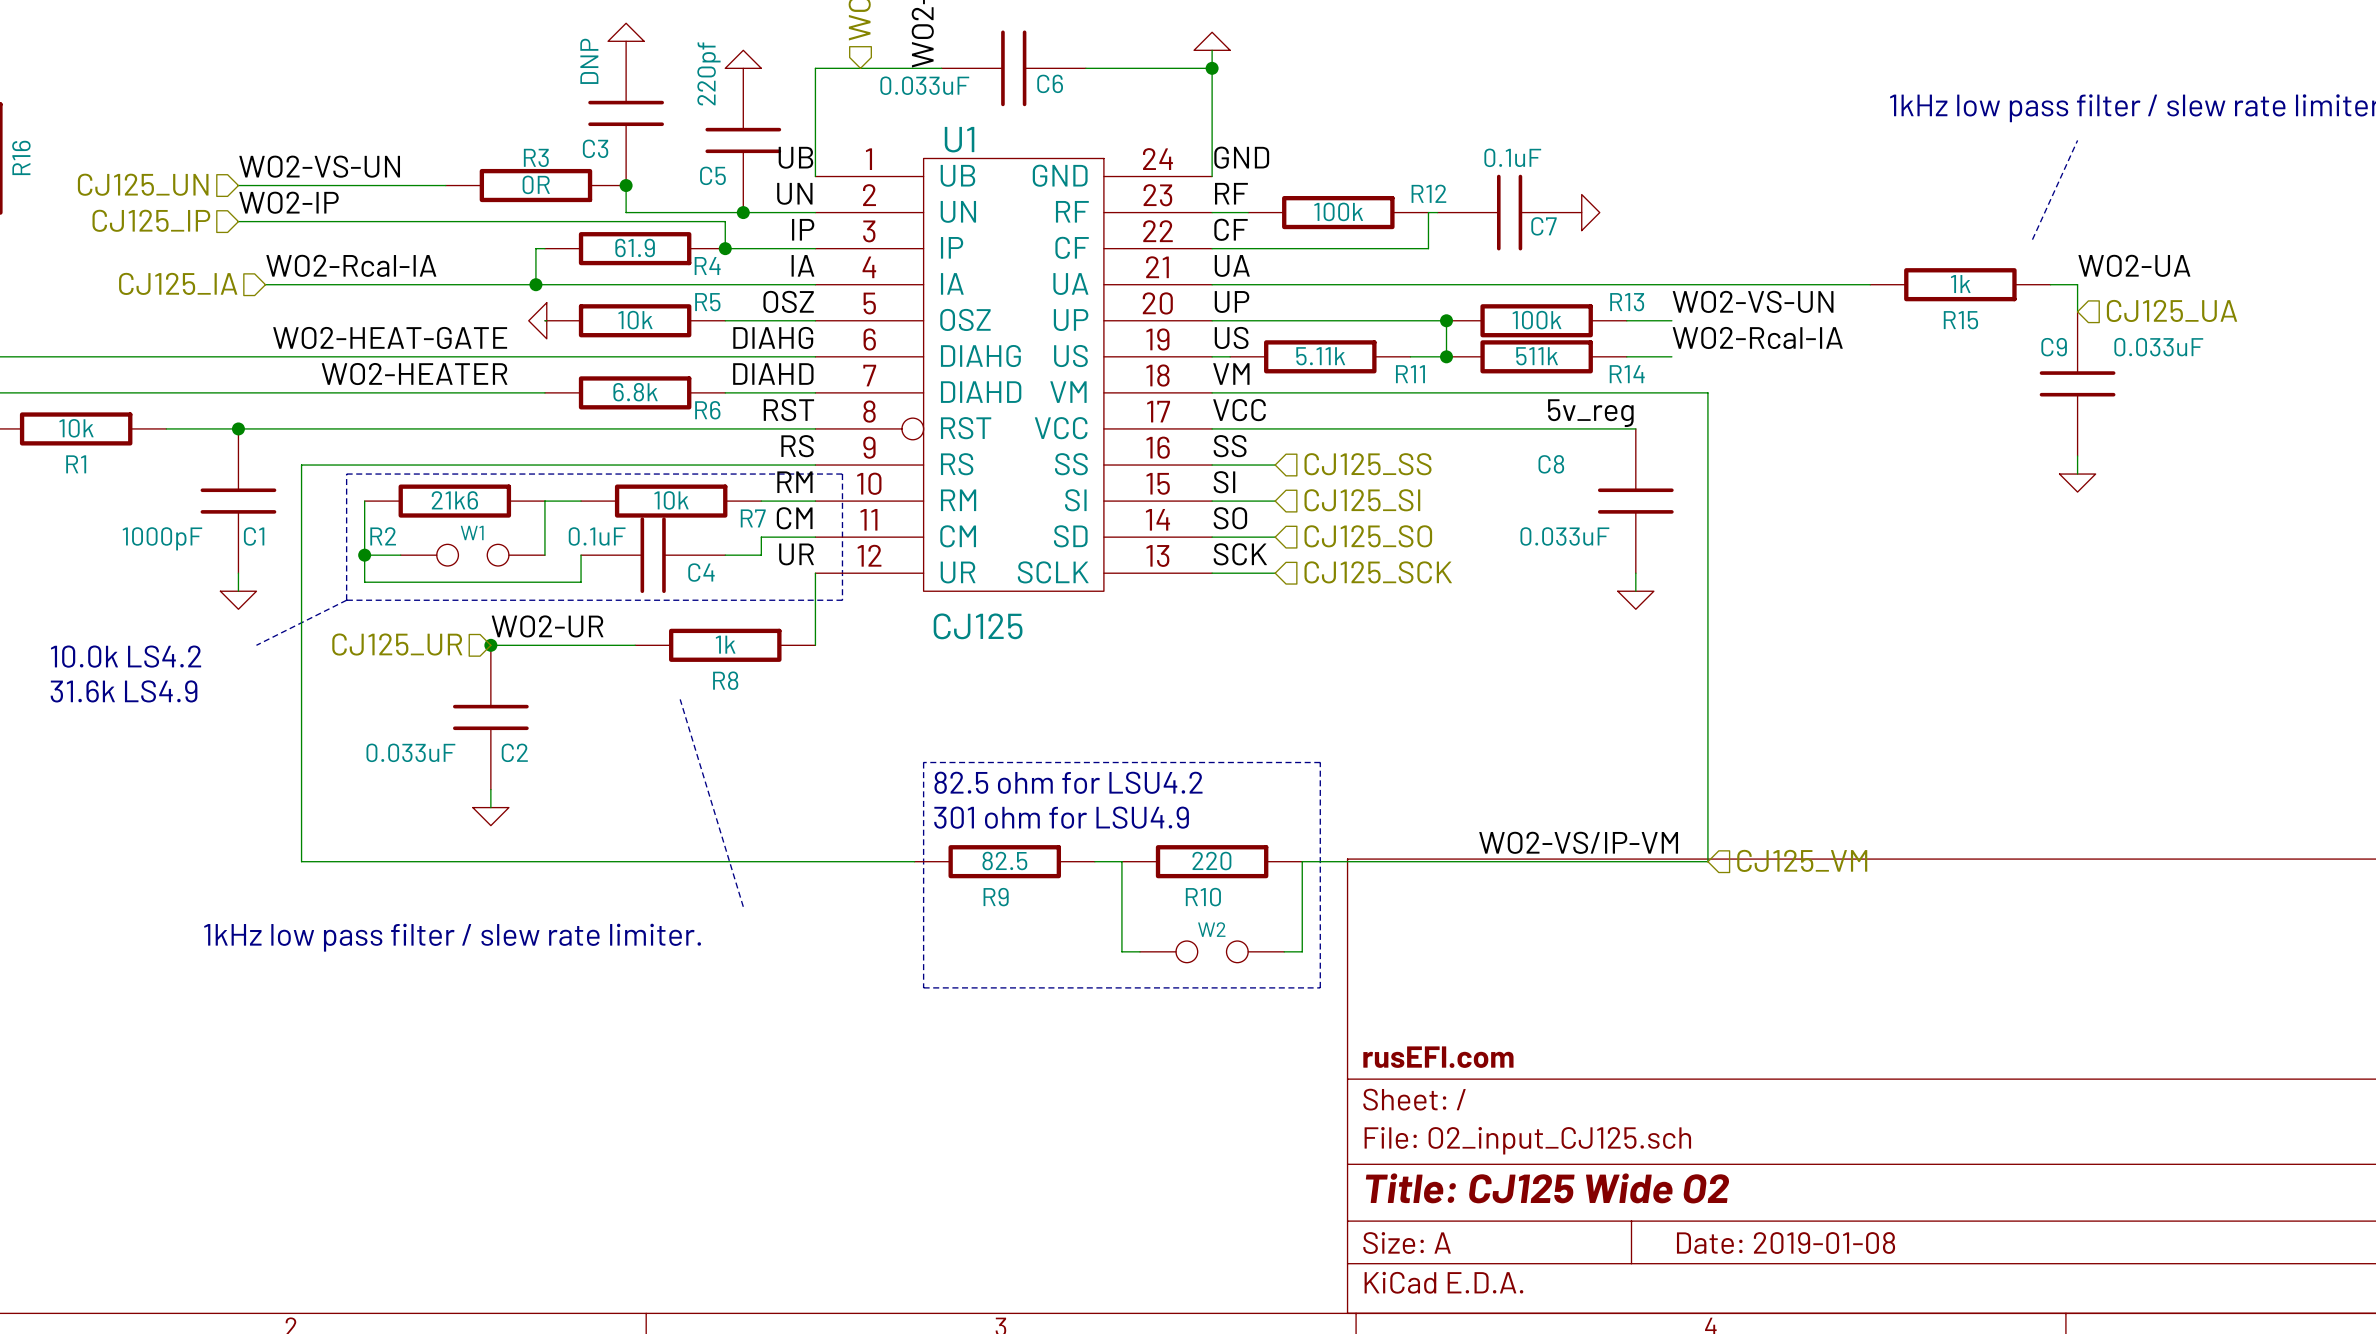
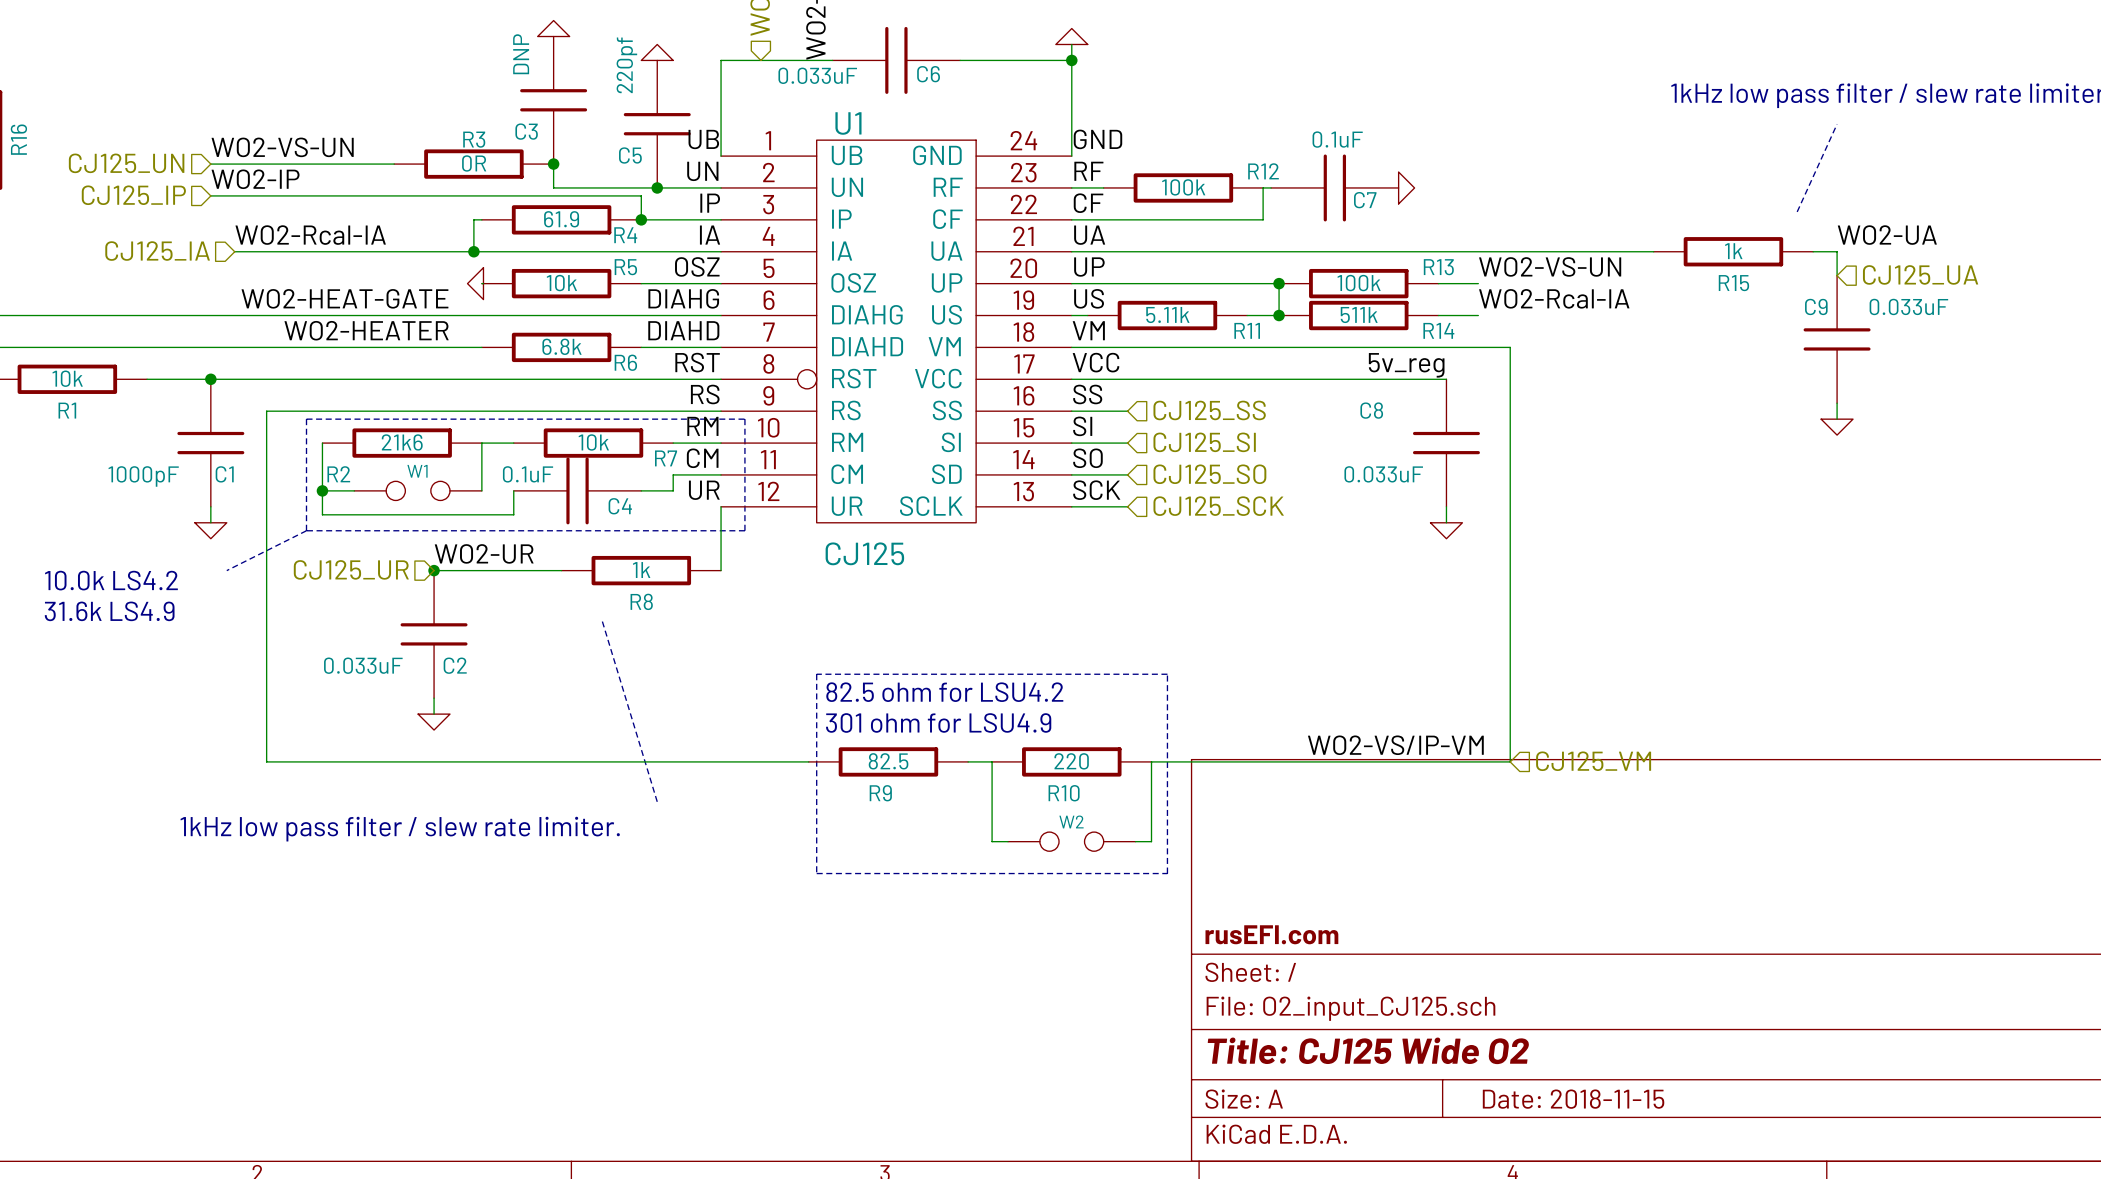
title block: Date: 2019-01-08 (1786, 1243) -> Date: 2018-11-15 (1573, 1099)

